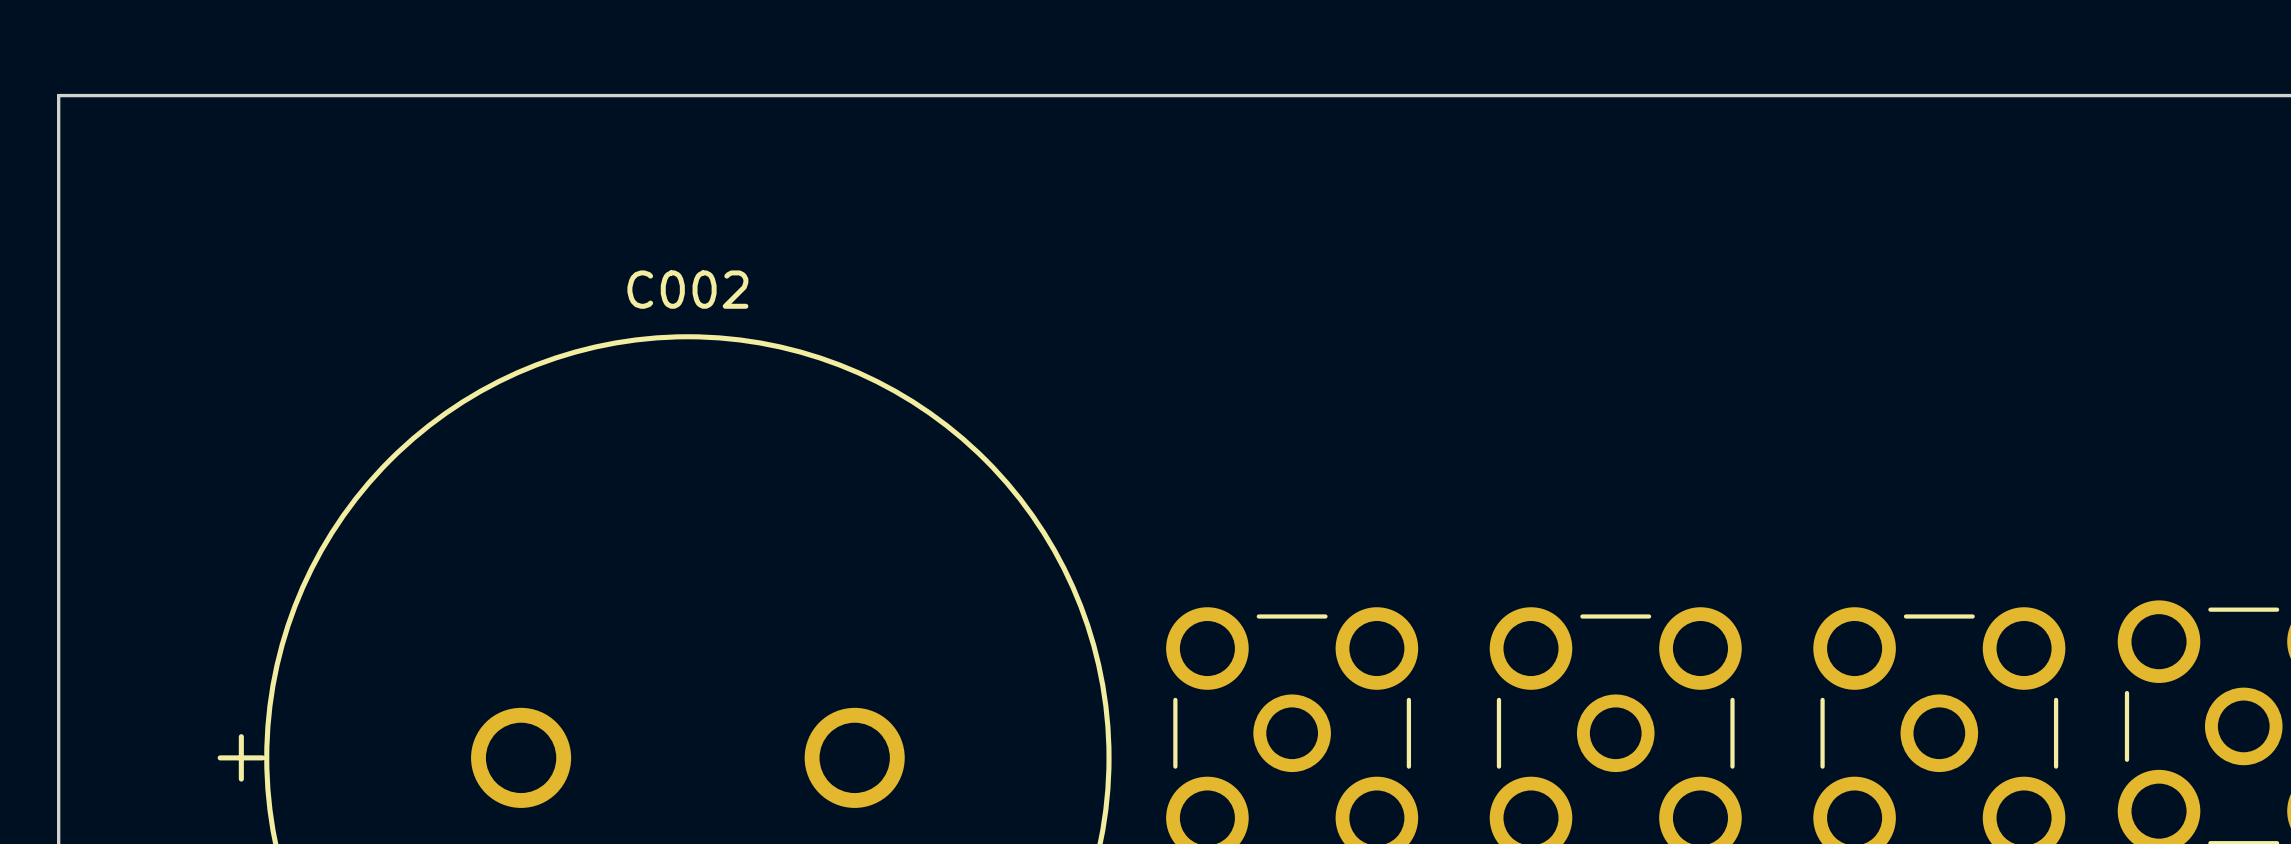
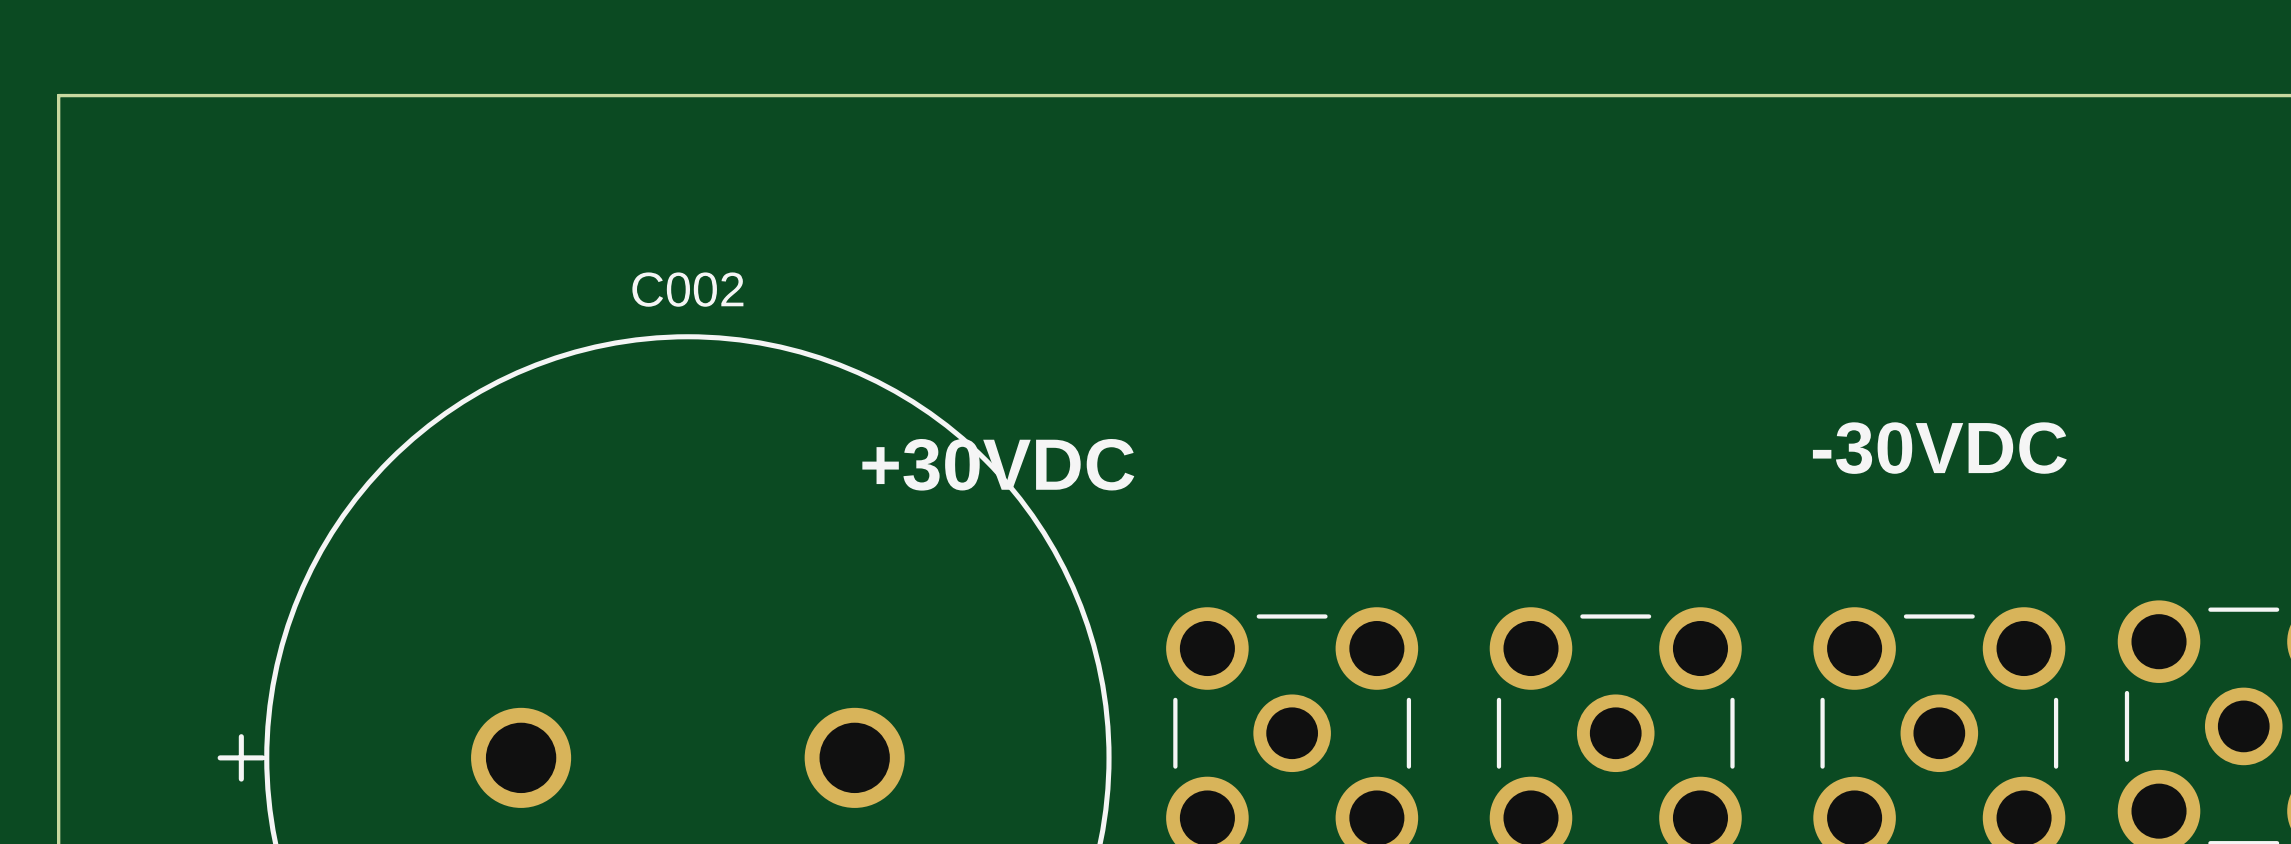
text: none -> -30VDC (1939, 448)
text: none -> +30VDC (998, 464)

